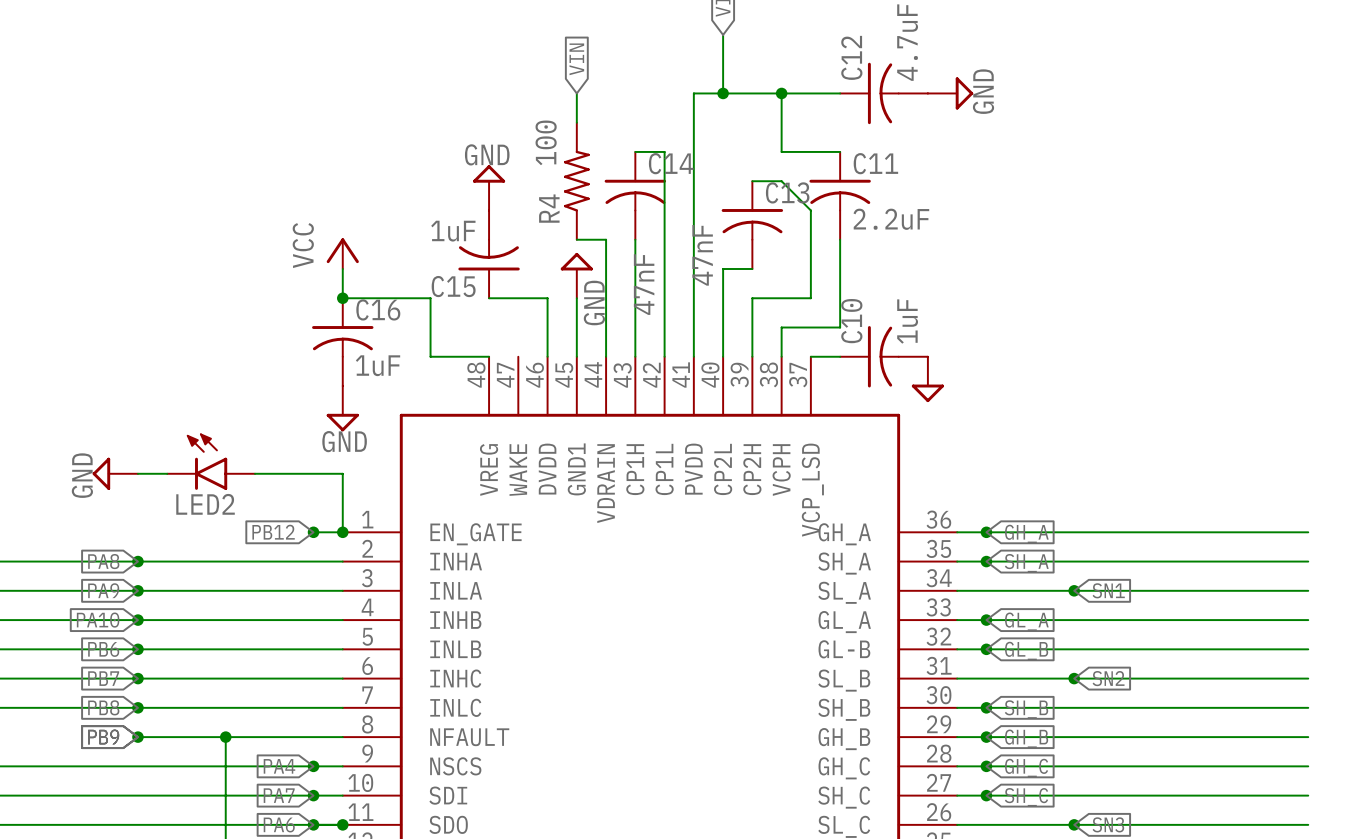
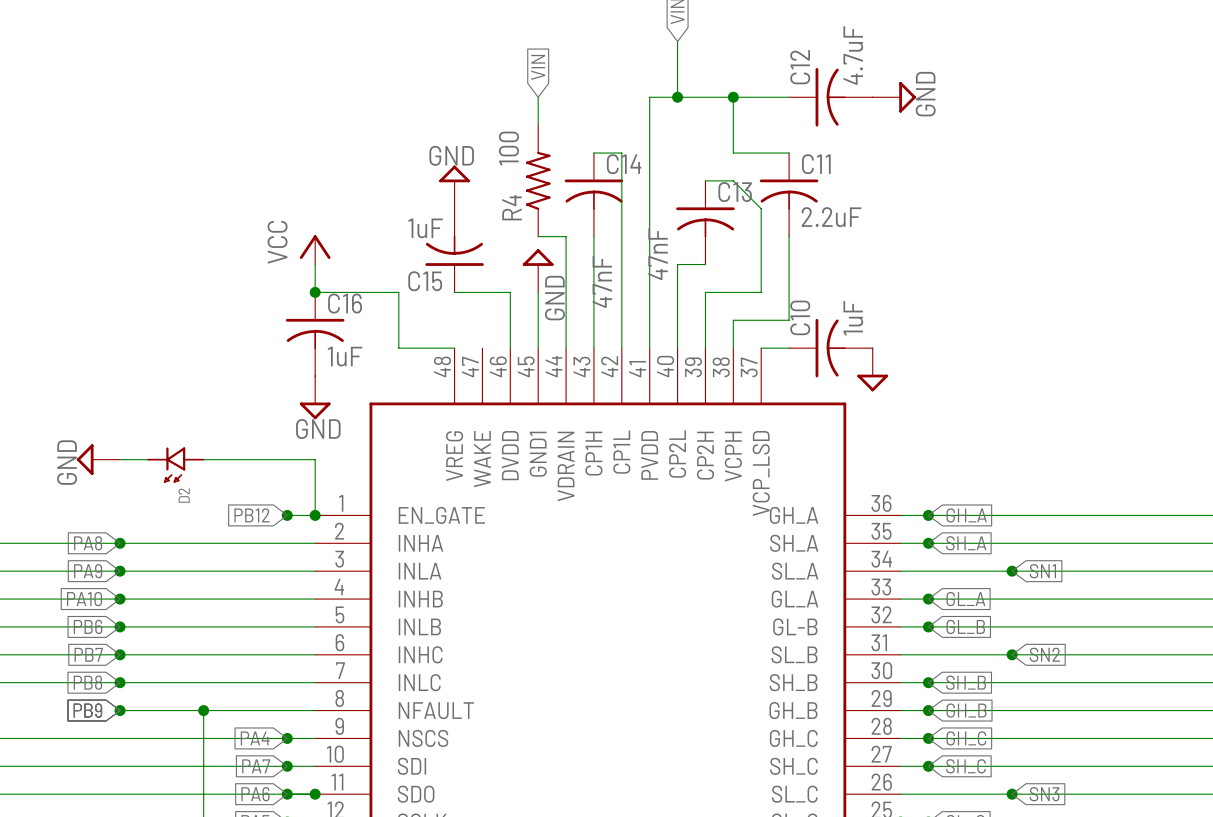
LED2: (211, 461) -> none
D2: none -> (175, 465)

